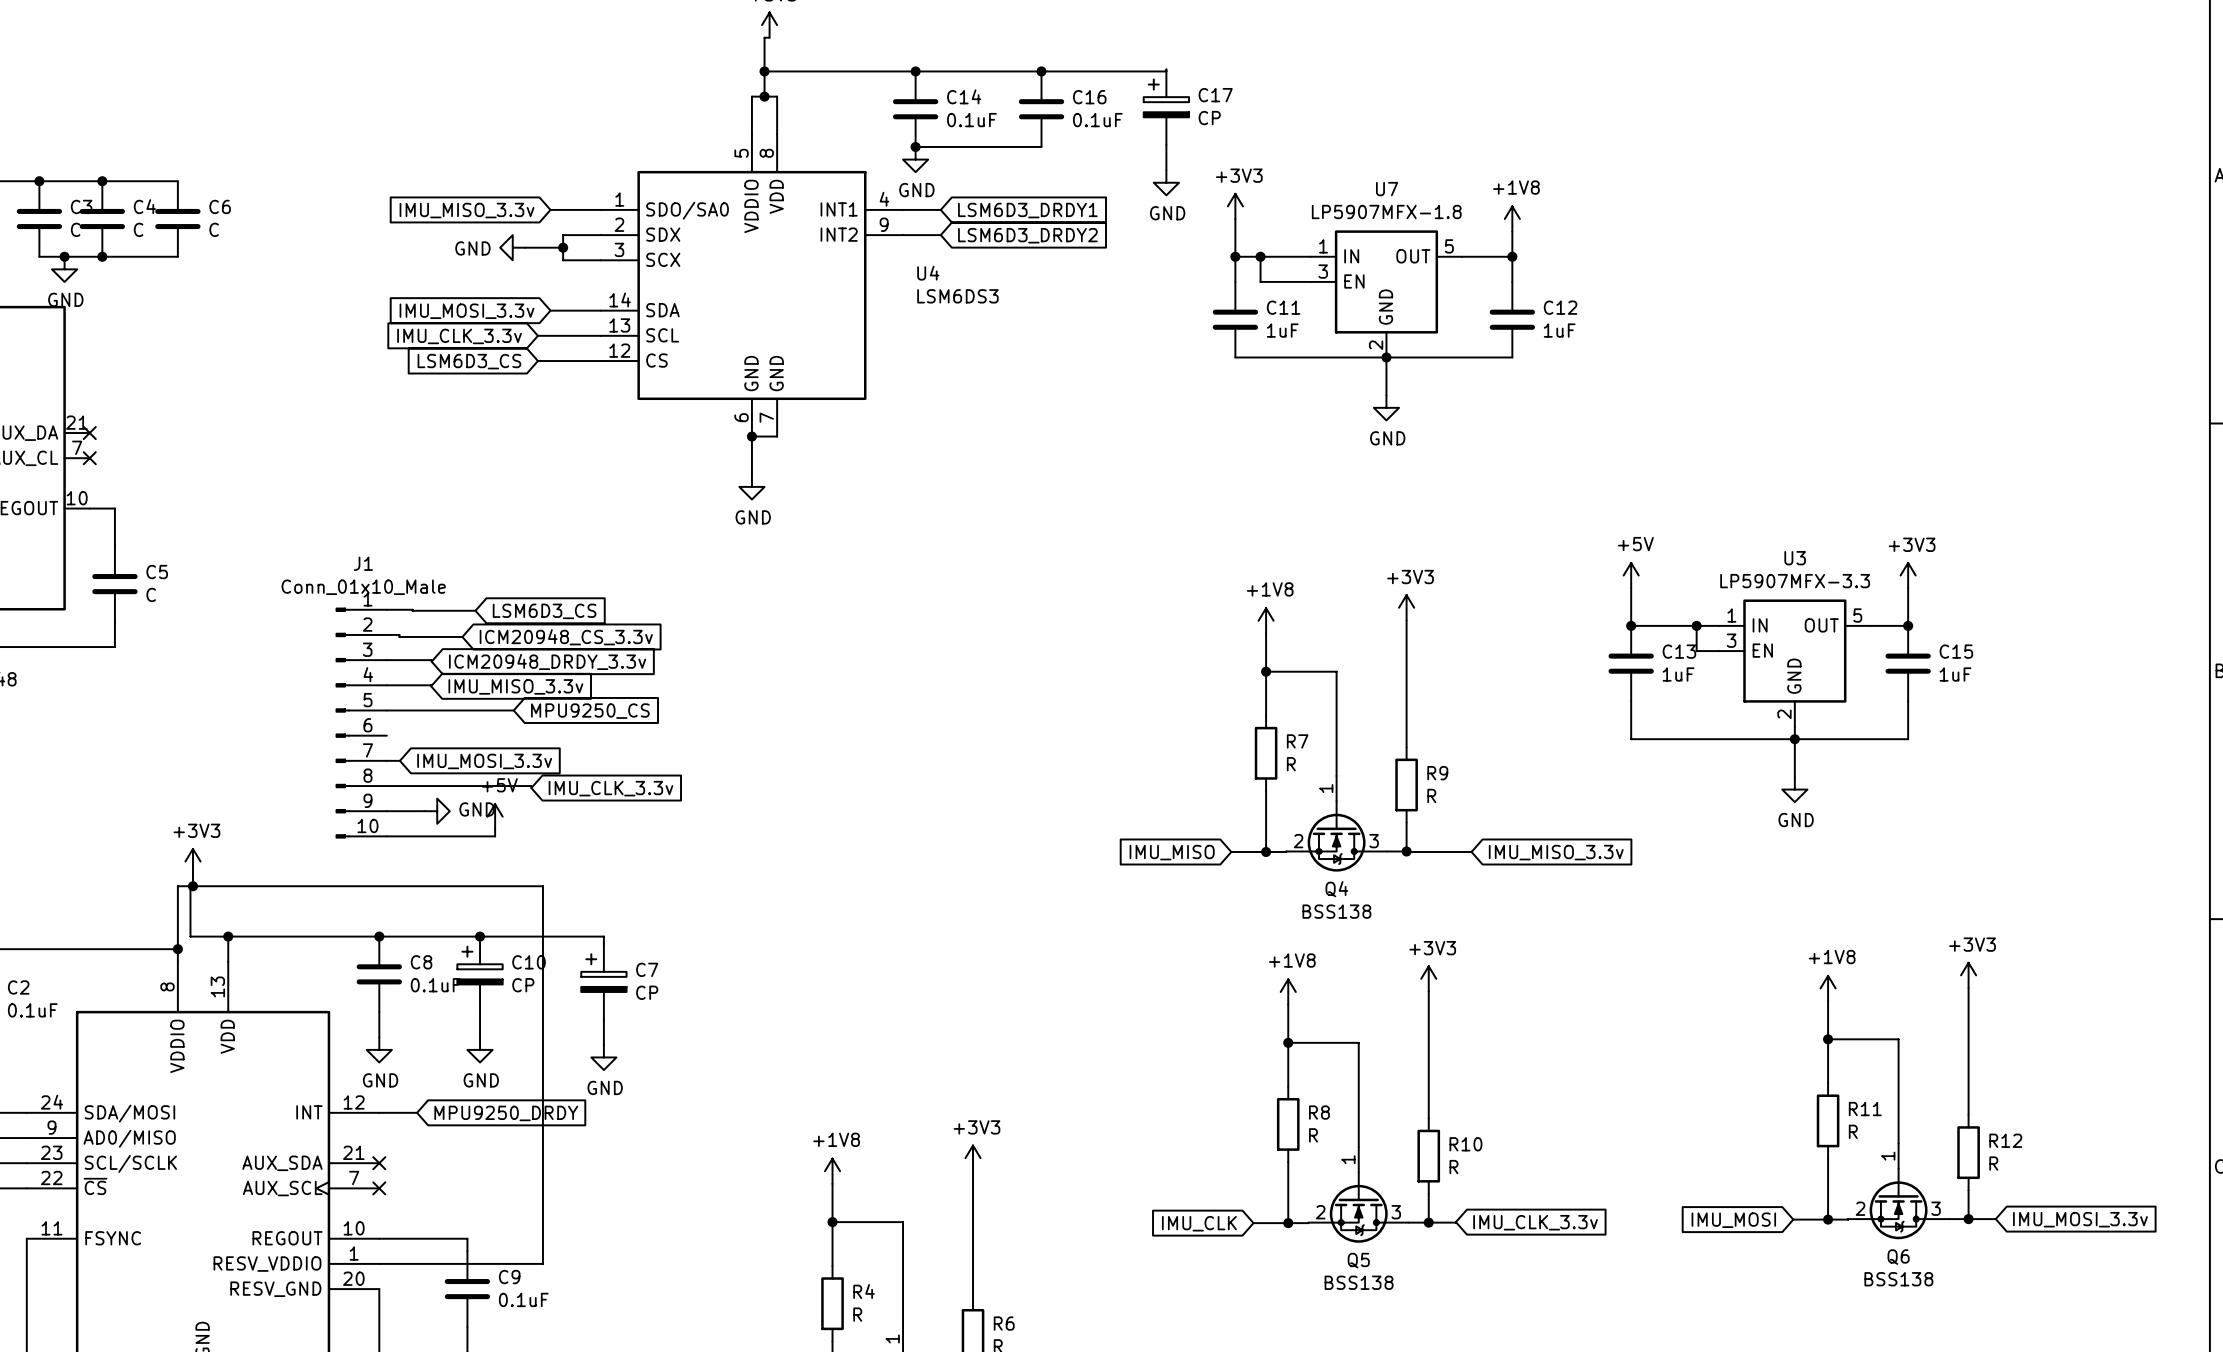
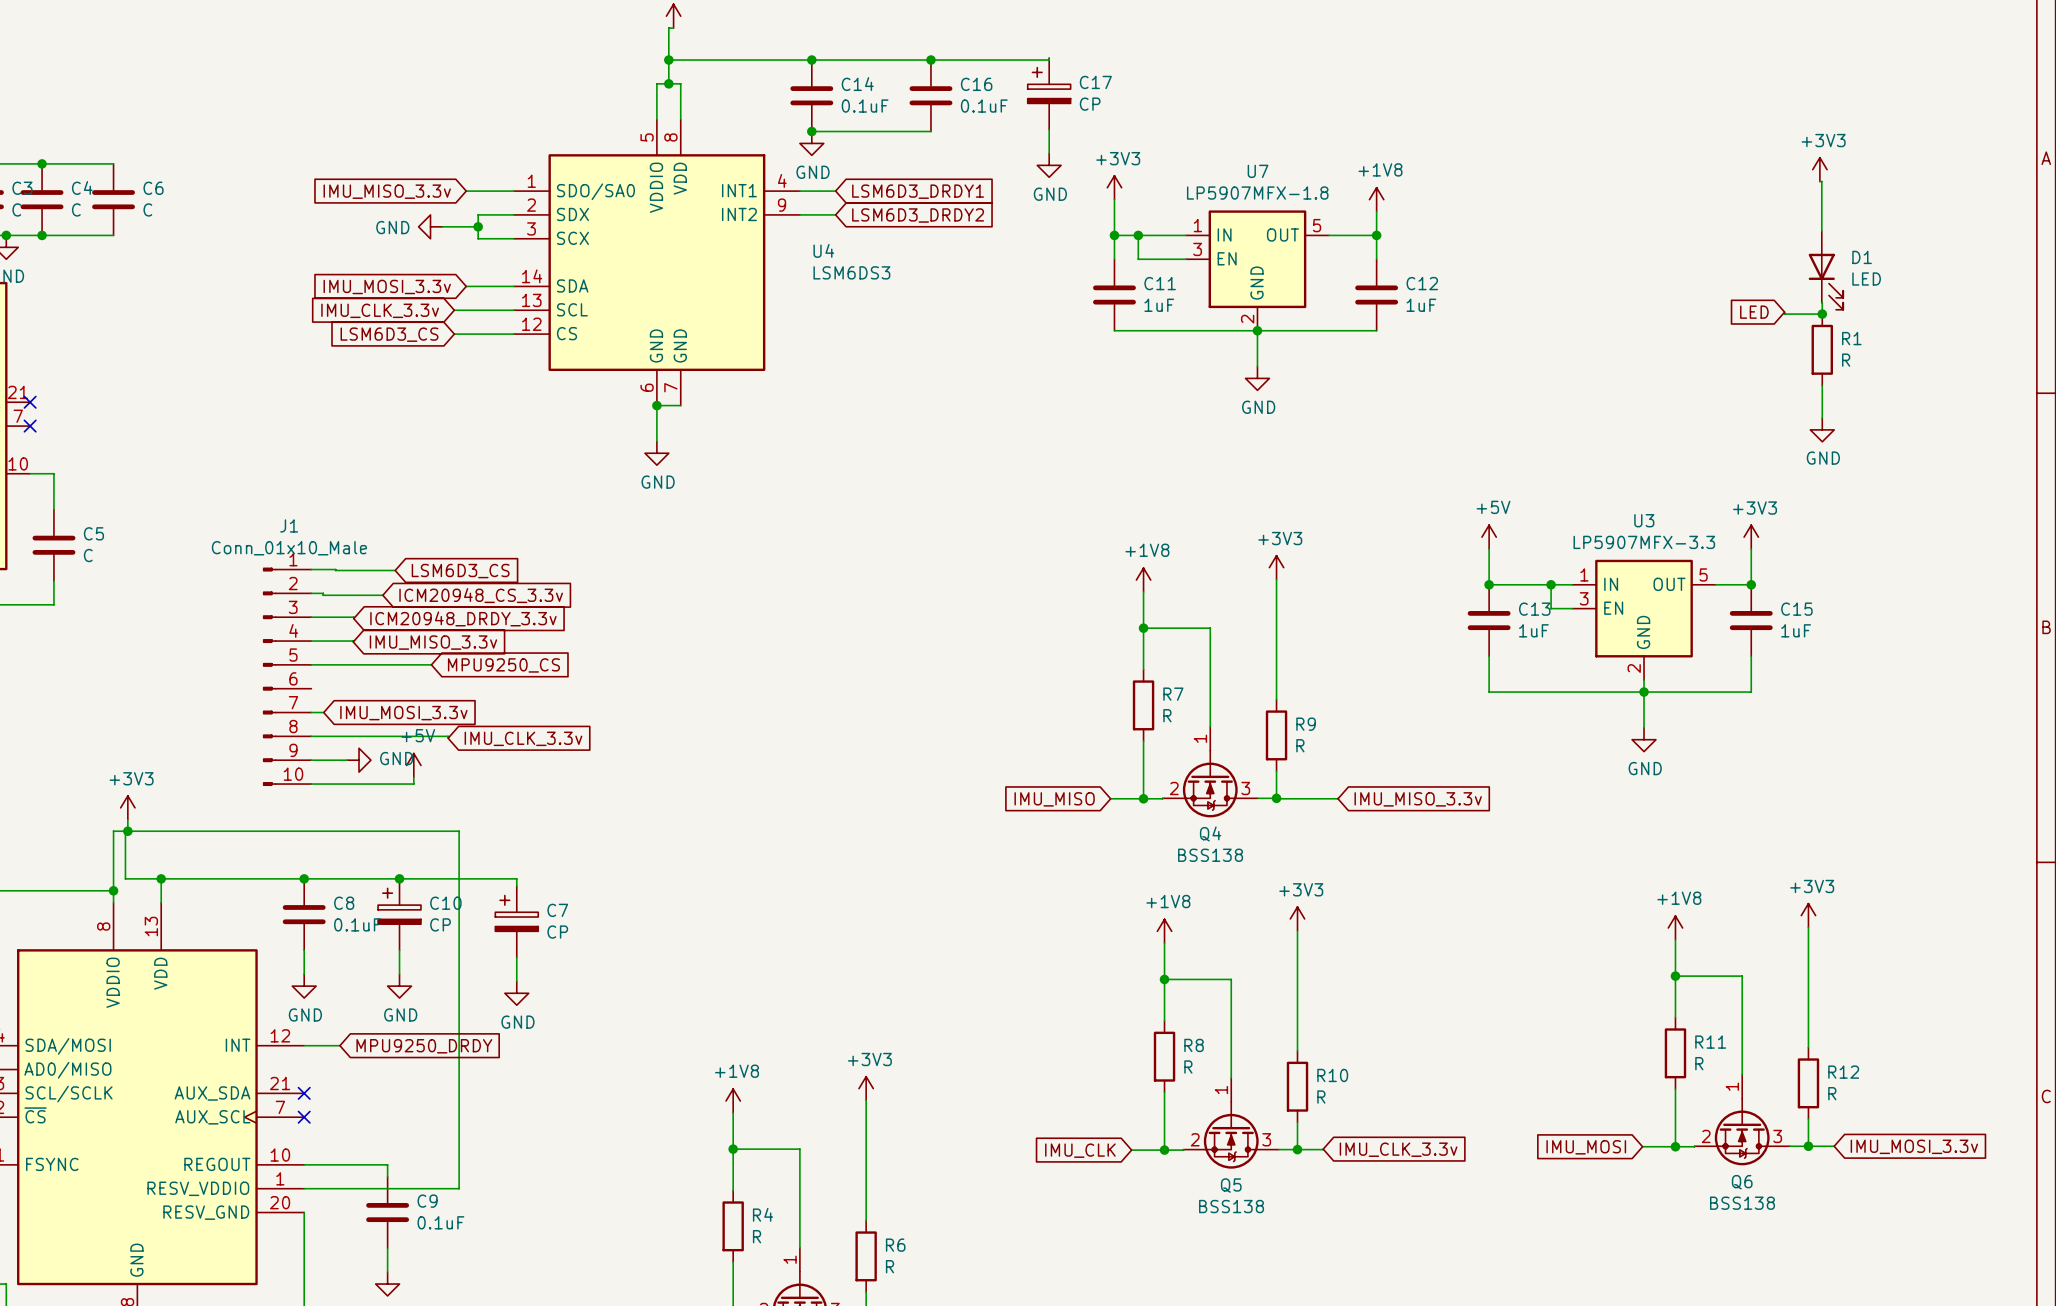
power symbol: none -> +3V3 (1819, 169)
wire: none -> (1819, 181) (1821, 181) (1821, 231)
D1: none -> LED (1825, 270)
wire: none -> (1821, 302) (1822, 314) (1784, 314) (1784, 312)
global label: none -> LED (1754, 312)
junction: none -> (1822, 314)
R1: none -> R (1822, 349)
wire: none -> (1822, 385) (1822, 417)
power symbol: none -> GND (1822, 429)

